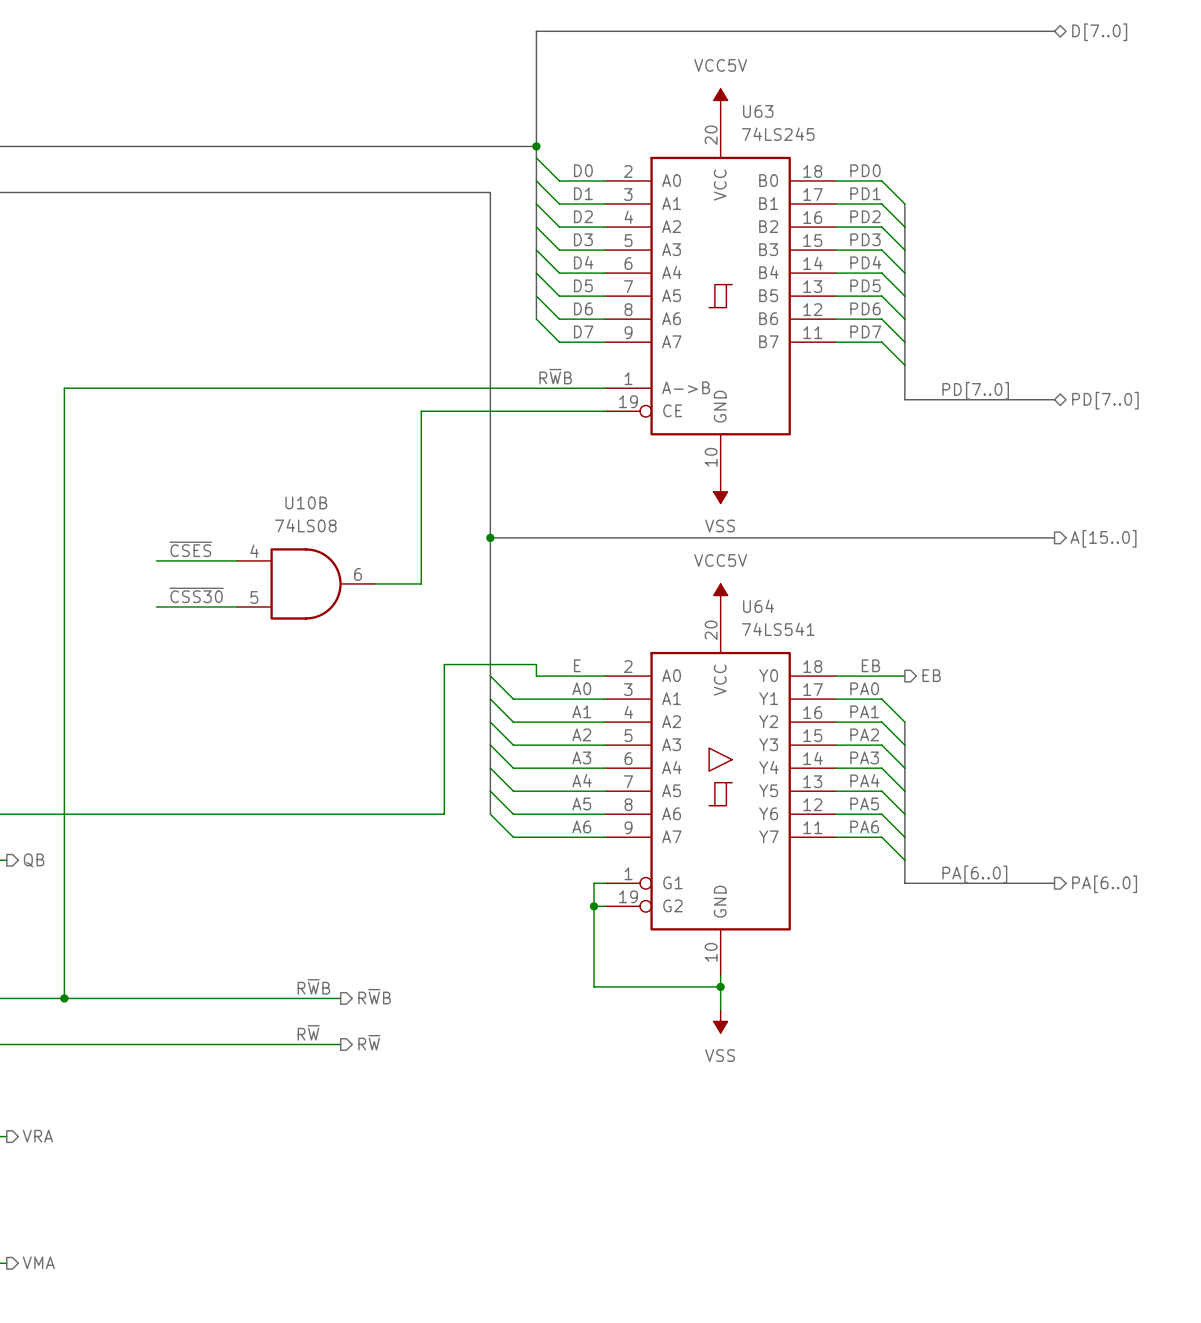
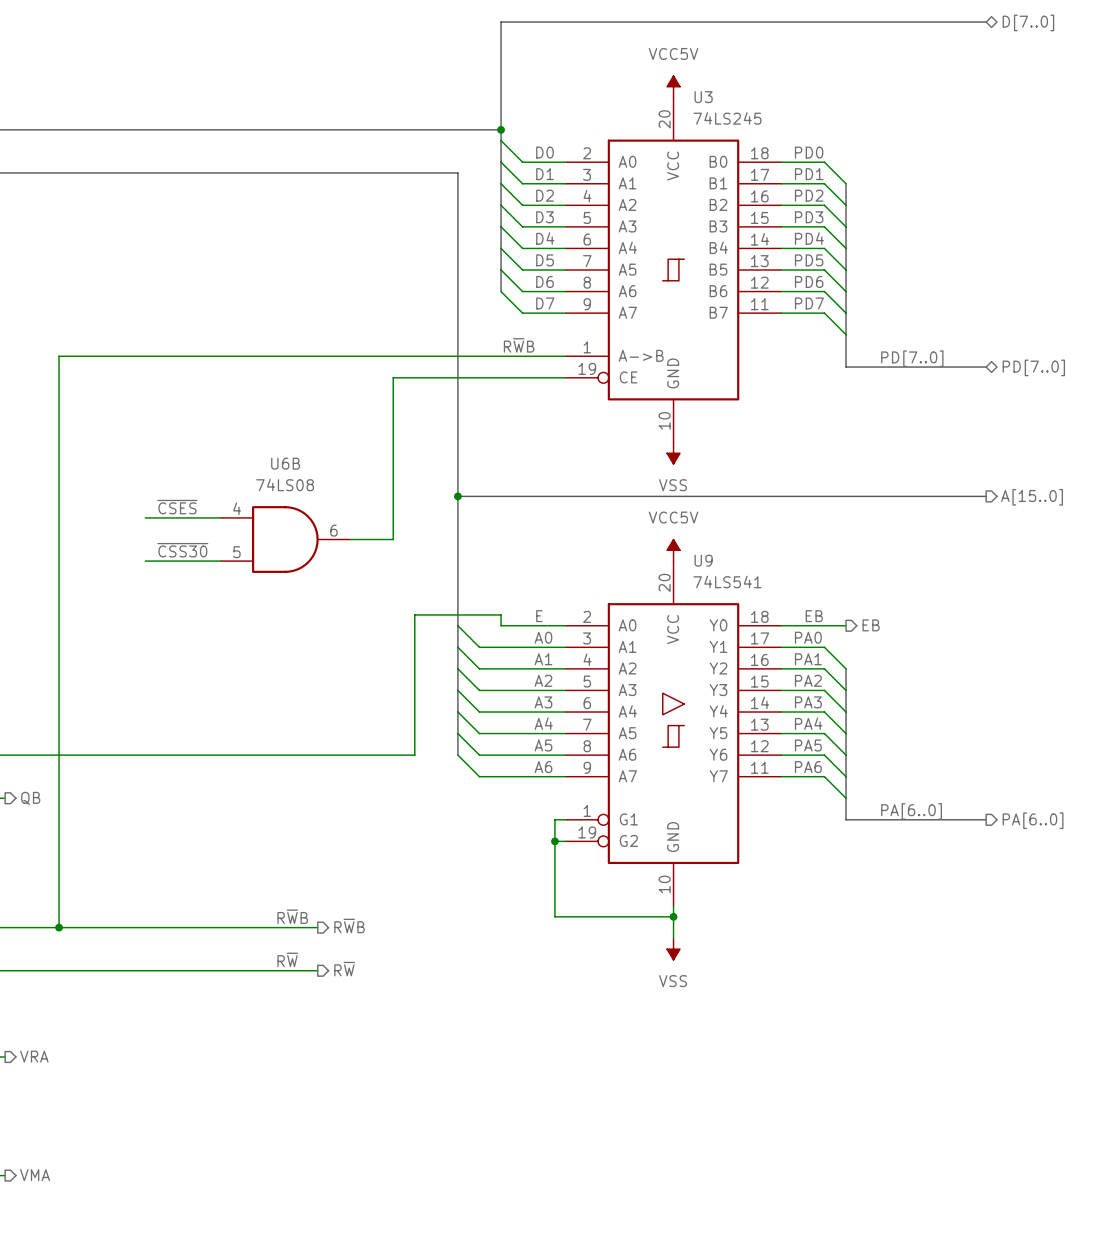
U63 name: U63 (758, 111) -> U3 (703, 97)
U10B name: U10B (306, 502) -> U6B (285, 463)
U64 name: U64 (758, 606) -> U9 (703, 560)

